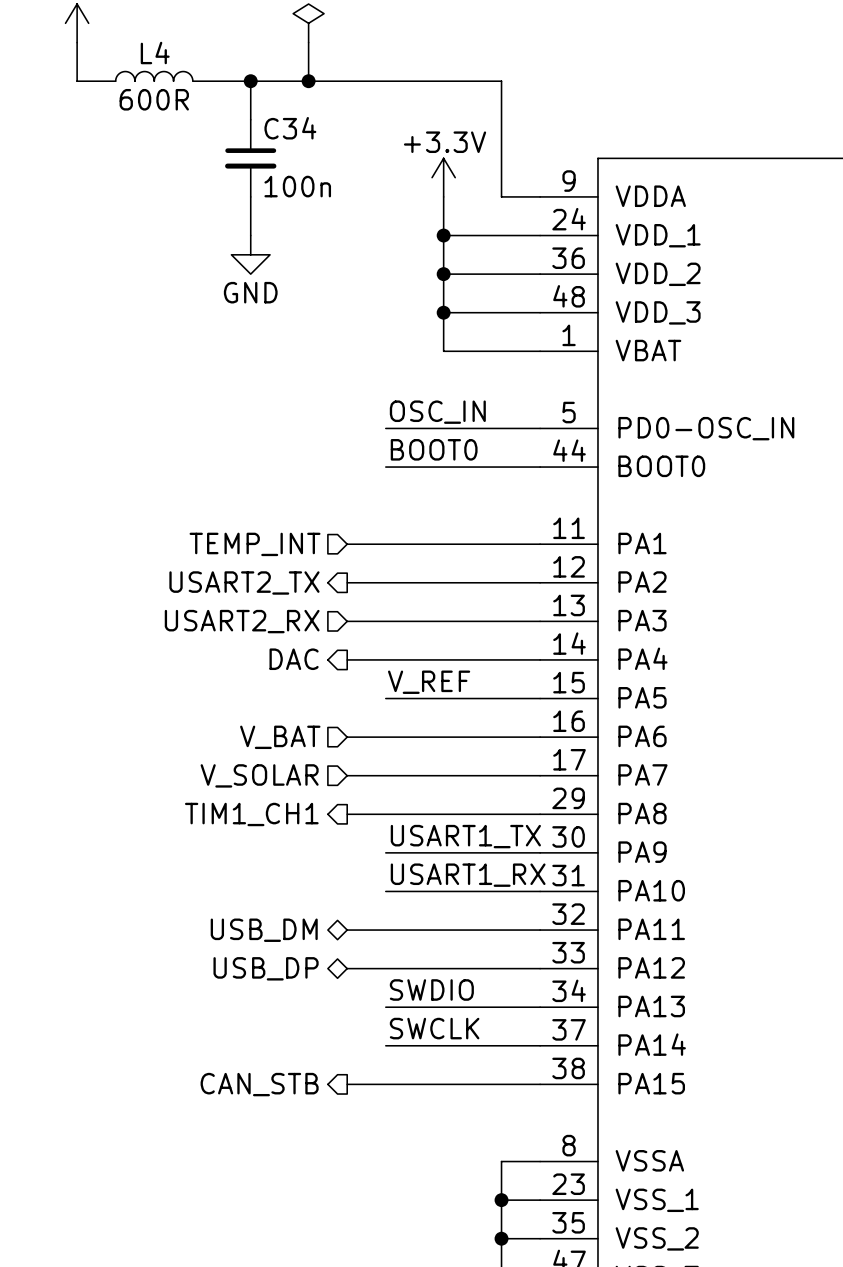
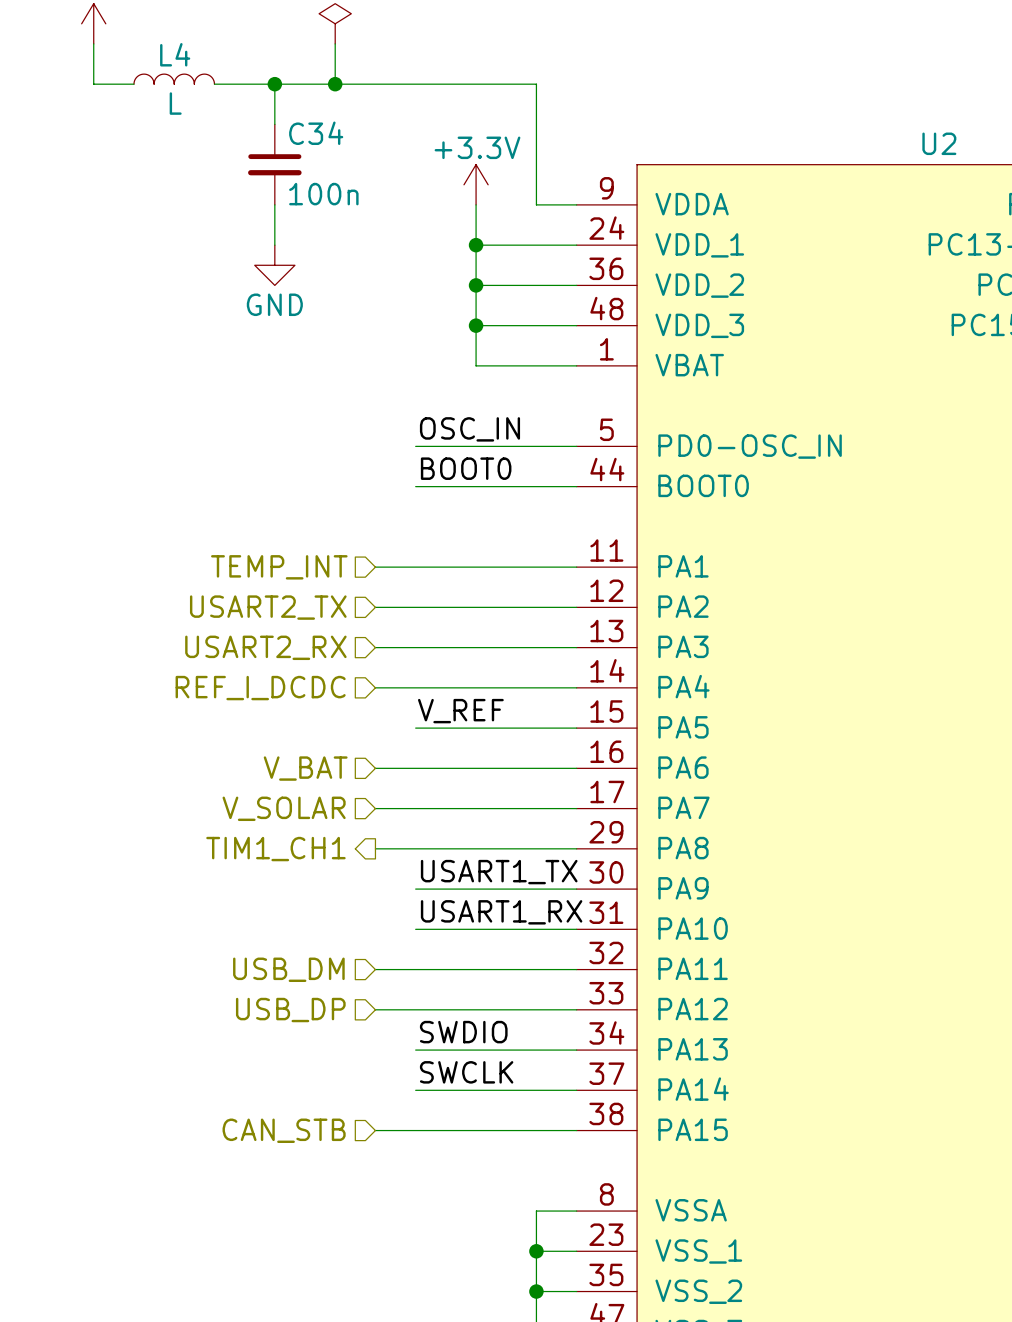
L4 value: 600R (154, 99) -> L (175, 103)
hierarchical label shape: output (244, 582) -> input (268, 607)
hierarchical label shape: output (294, 659) -> input (260, 688)
hierarchical label: DAC (294, 659) -> REF_I_DCDC (260, 688)
hierarchical label shape: bidirectional (264, 930) -> input (288, 969)
hierarchical label shape: bidirectional (266, 968) -> input (290, 1010)
hierarchical label shape: output (259, 1084) -> input (284, 1130)

